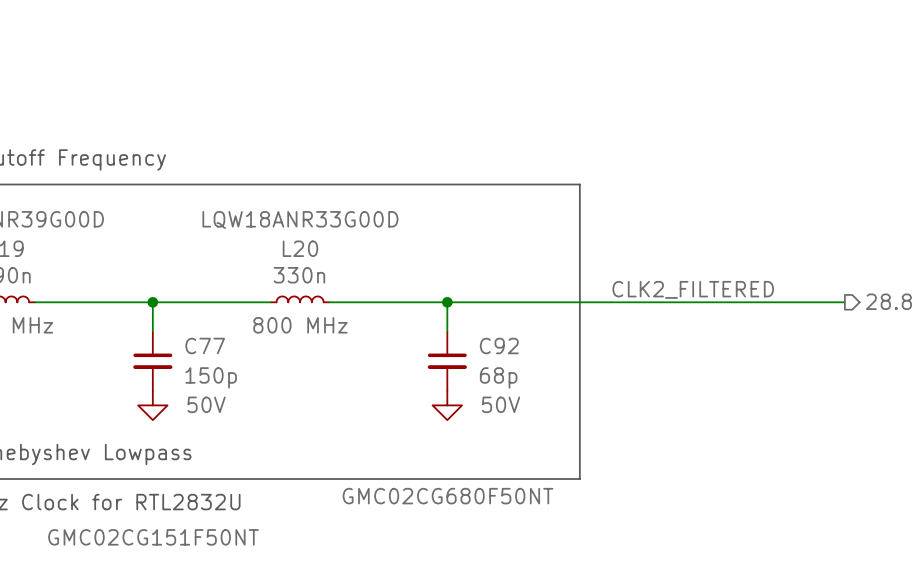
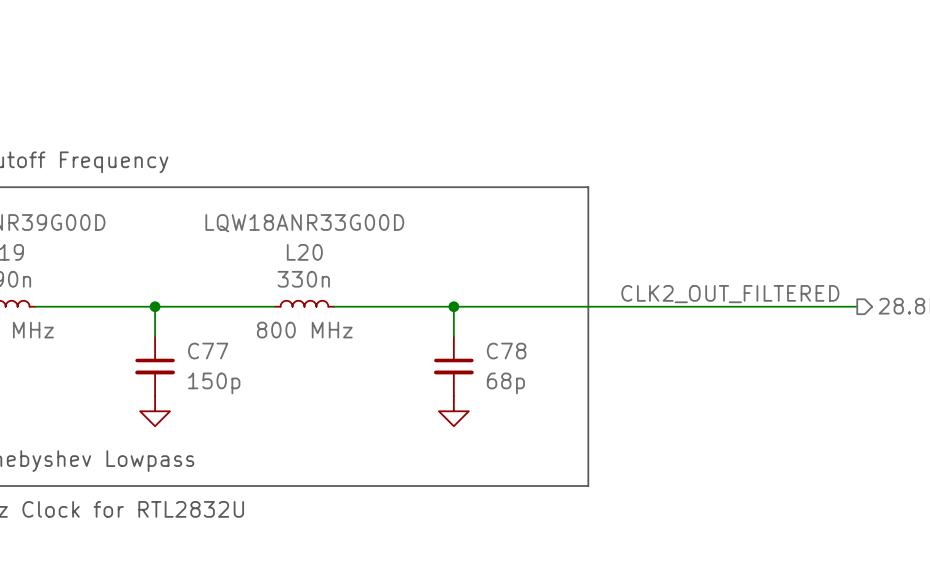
label: CLK2_FILTERED (693, 289) -> CLK2_OUT_FILTERED (730, 294)
C92 name: C92 (499, 346) -> C78 (506, 351)
C77 text: 50V (206, 404) -> none
C92 text: 50V (501, 404) -> none
C92 text: GMC02CG680F50NT (448, 496) -> none
C77 text: GMC02CG151F50NT (153, 537) -> none

